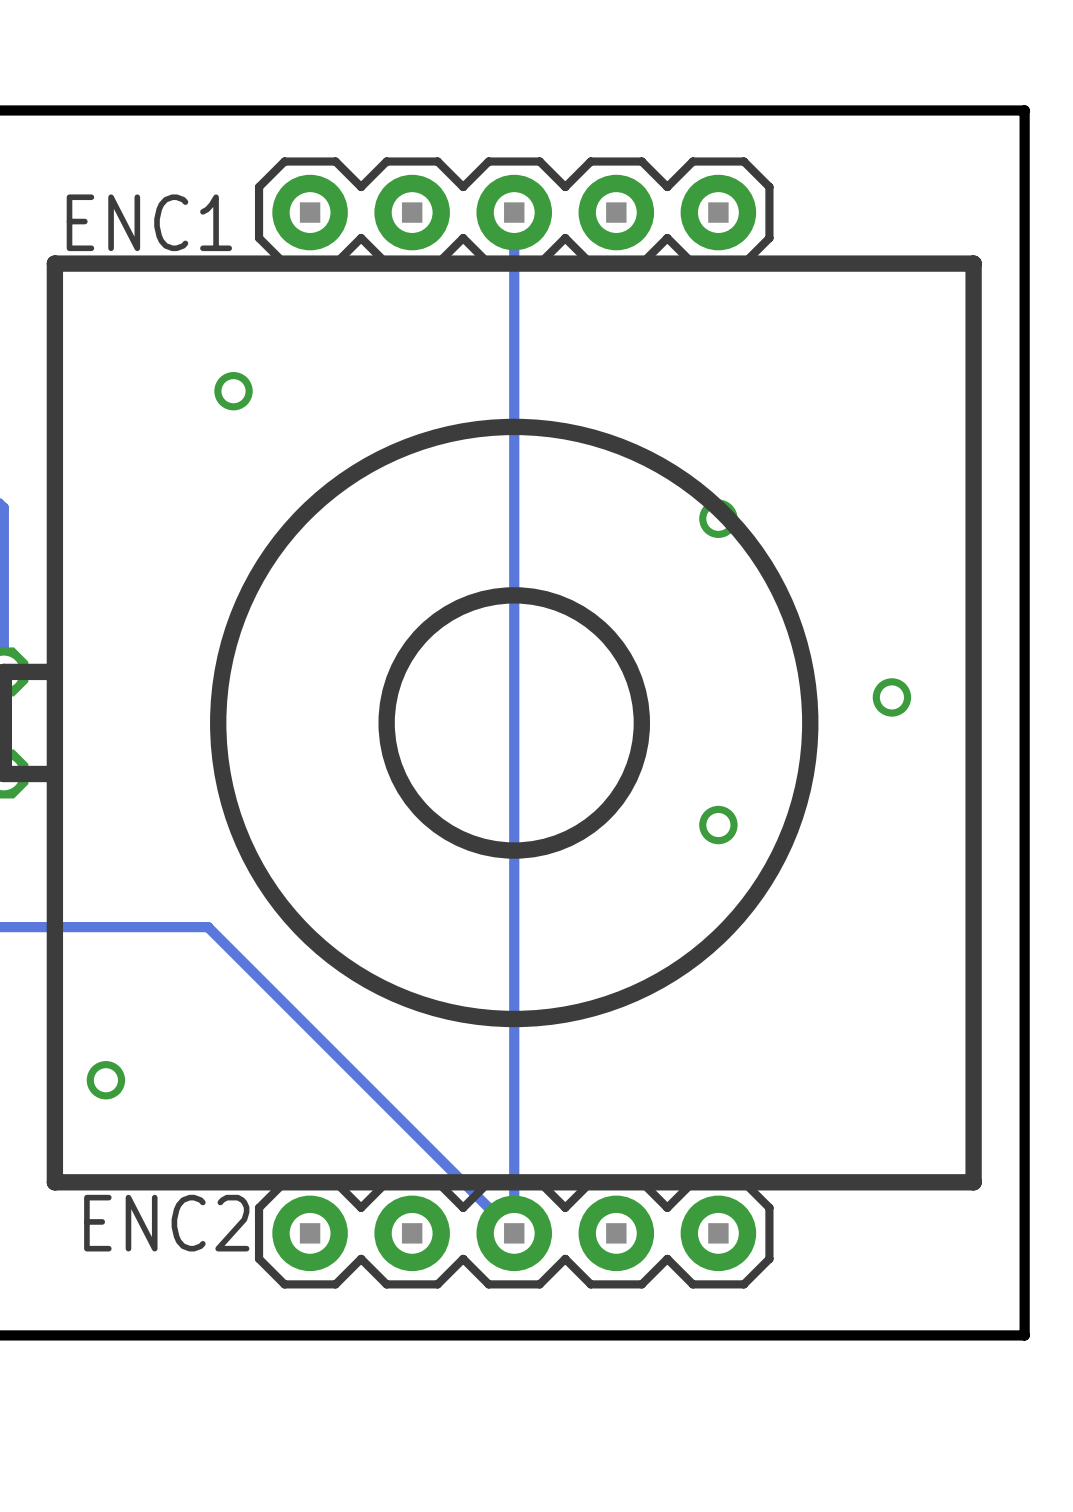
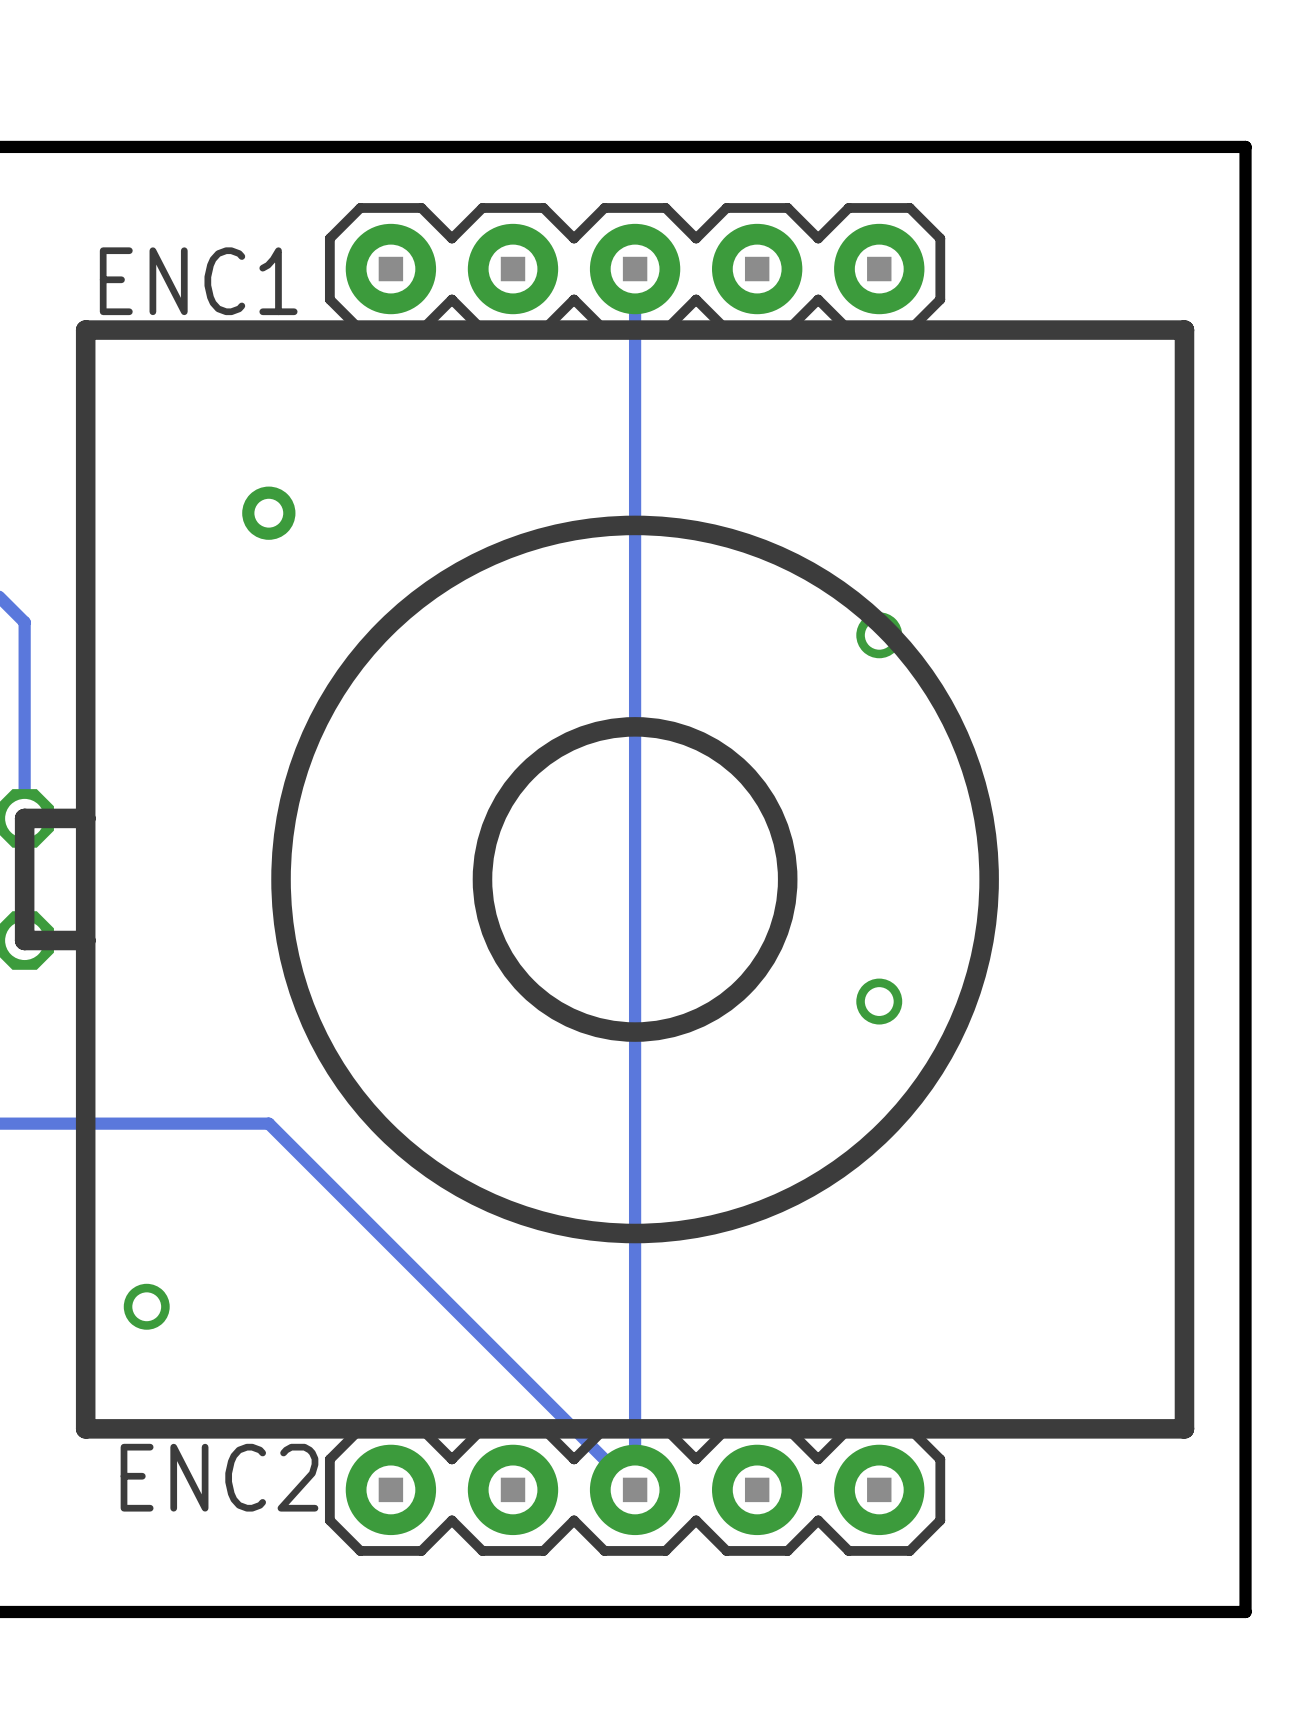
via position: (233, 391) -> (268, 513)
via: (891, 697) -> none

